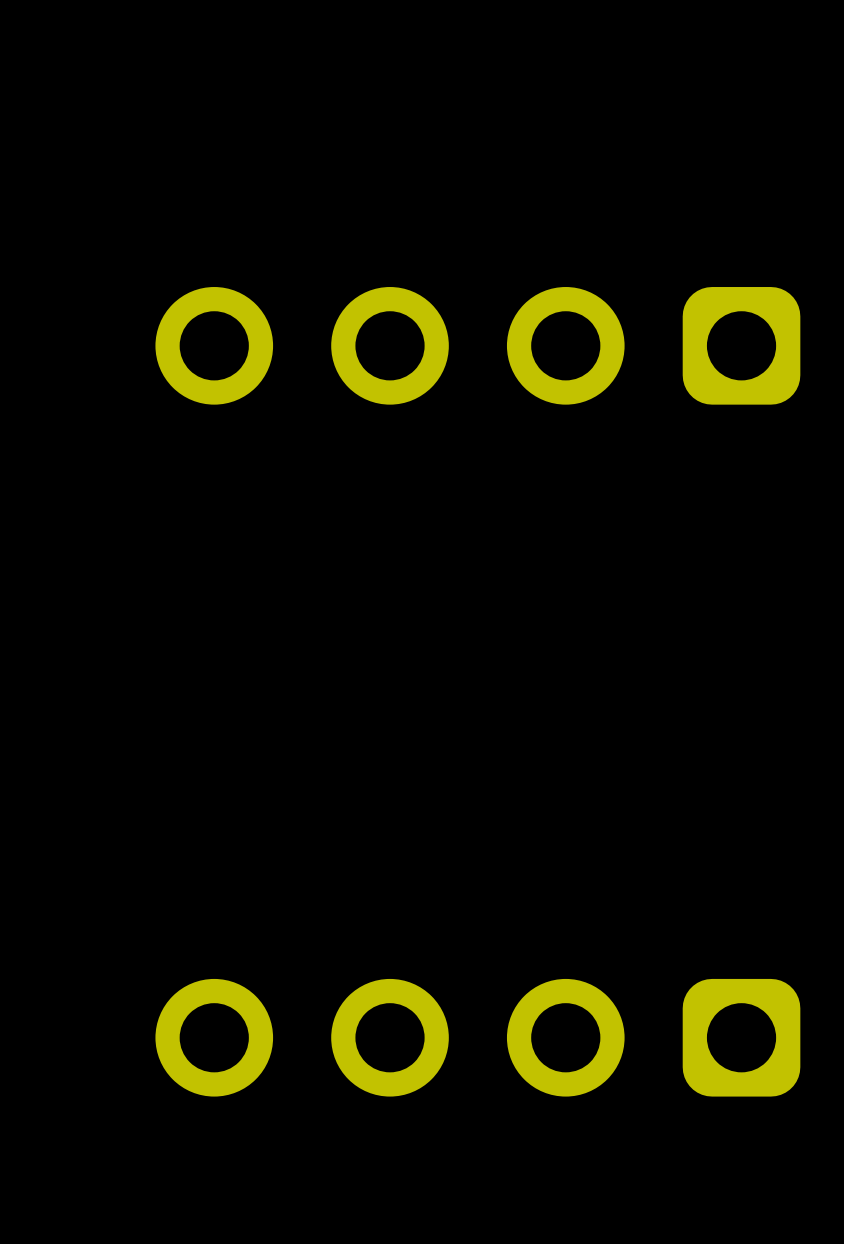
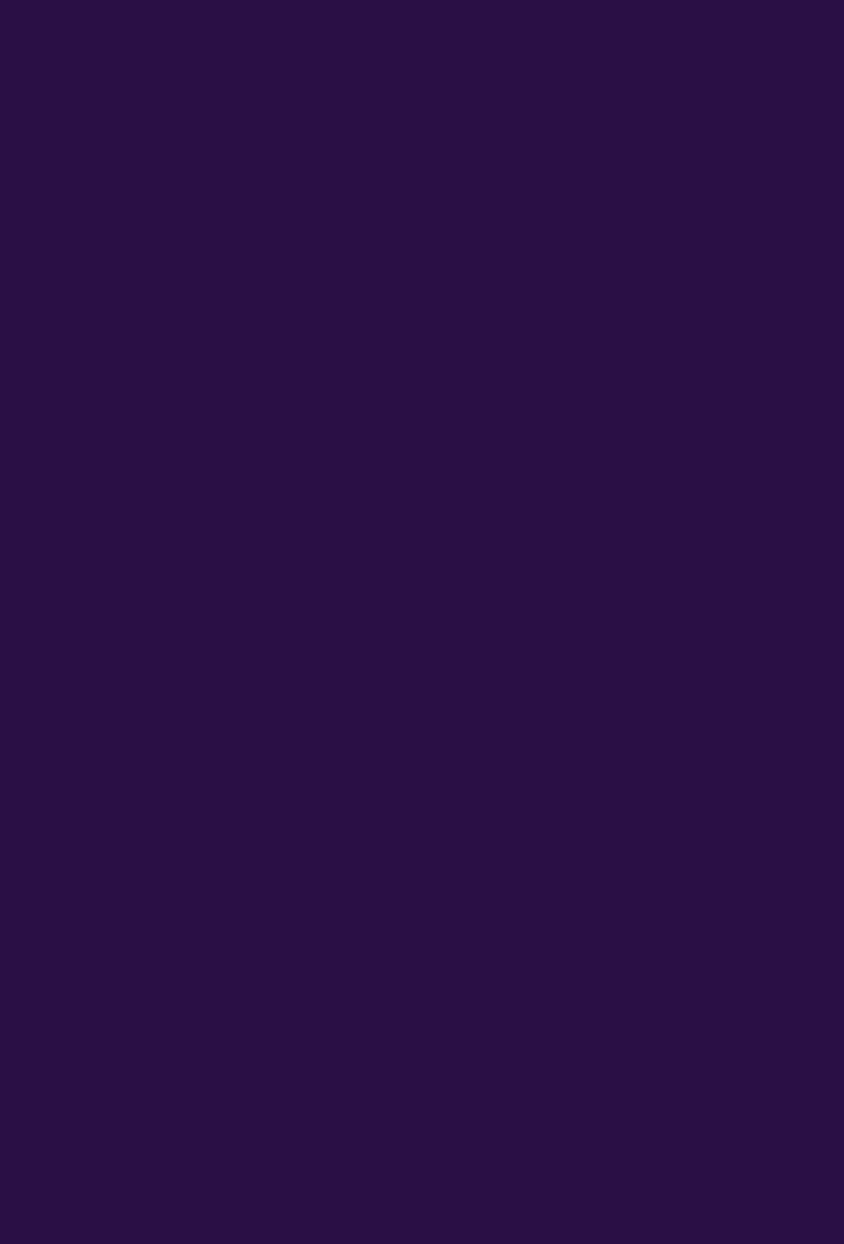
part: (477, 345) -> none
part: (477, 1037) -> none

